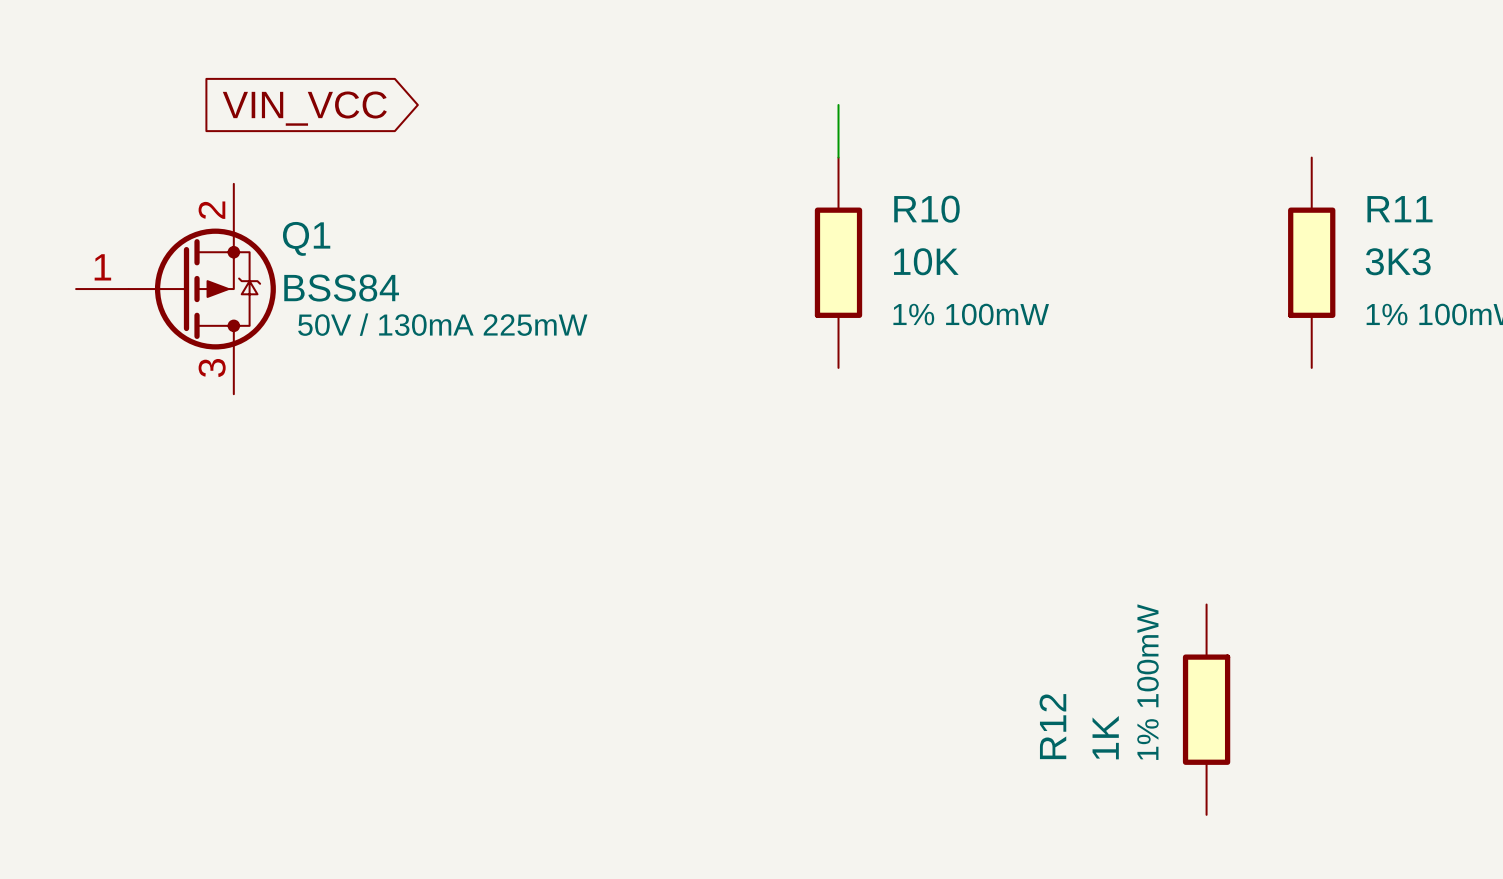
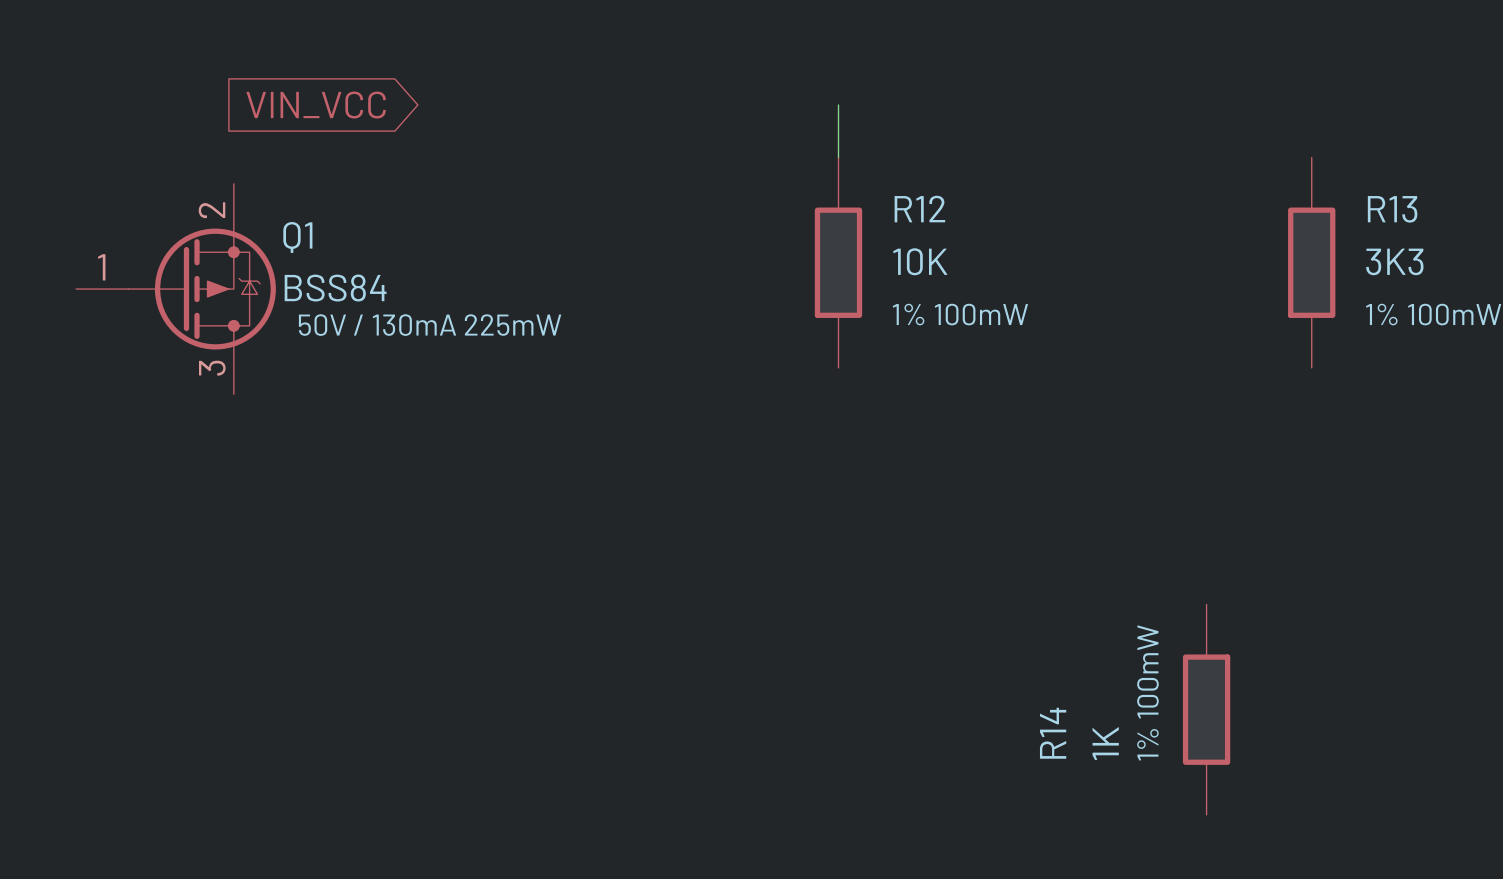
R10 name: R10 (926, 209) -> R12 (919, 209)
R11 name: R11 (1399, 209) -> R13 (1392, 209)
R12 name: R12 (1052, 726) -> R14 (1053, 733)

